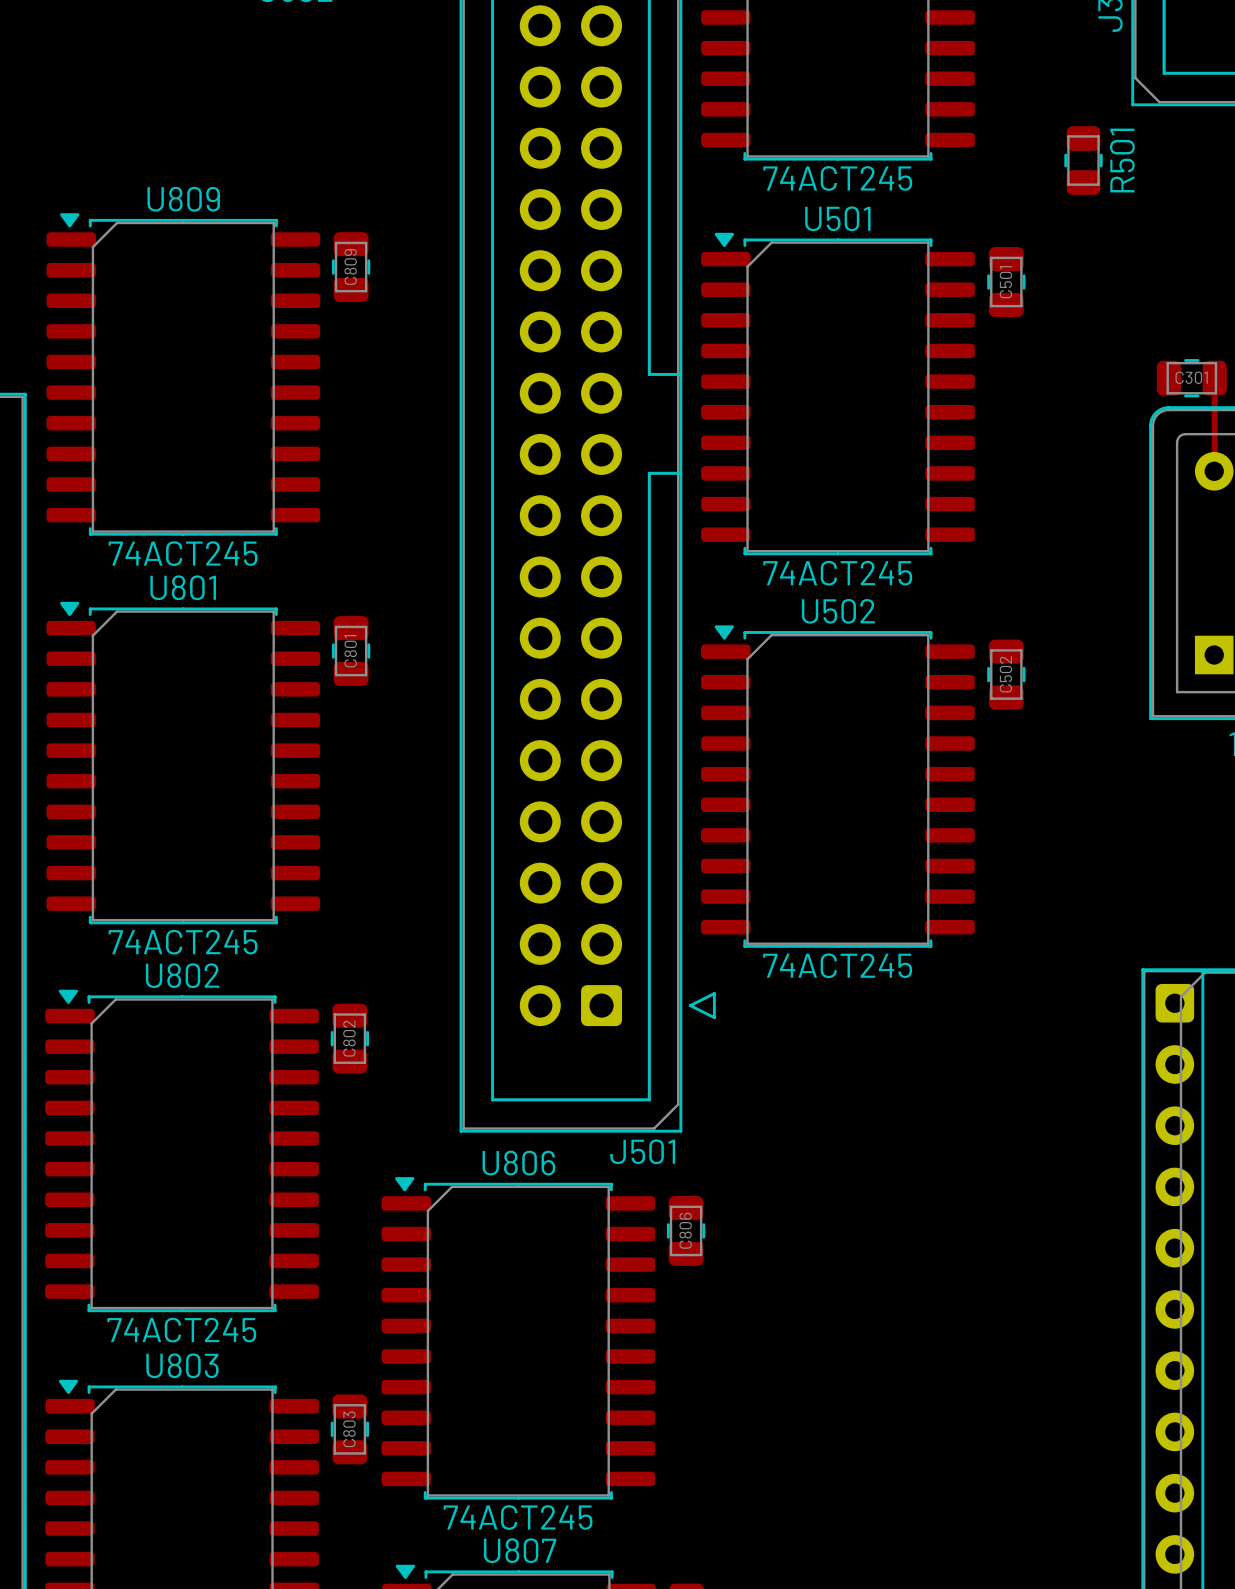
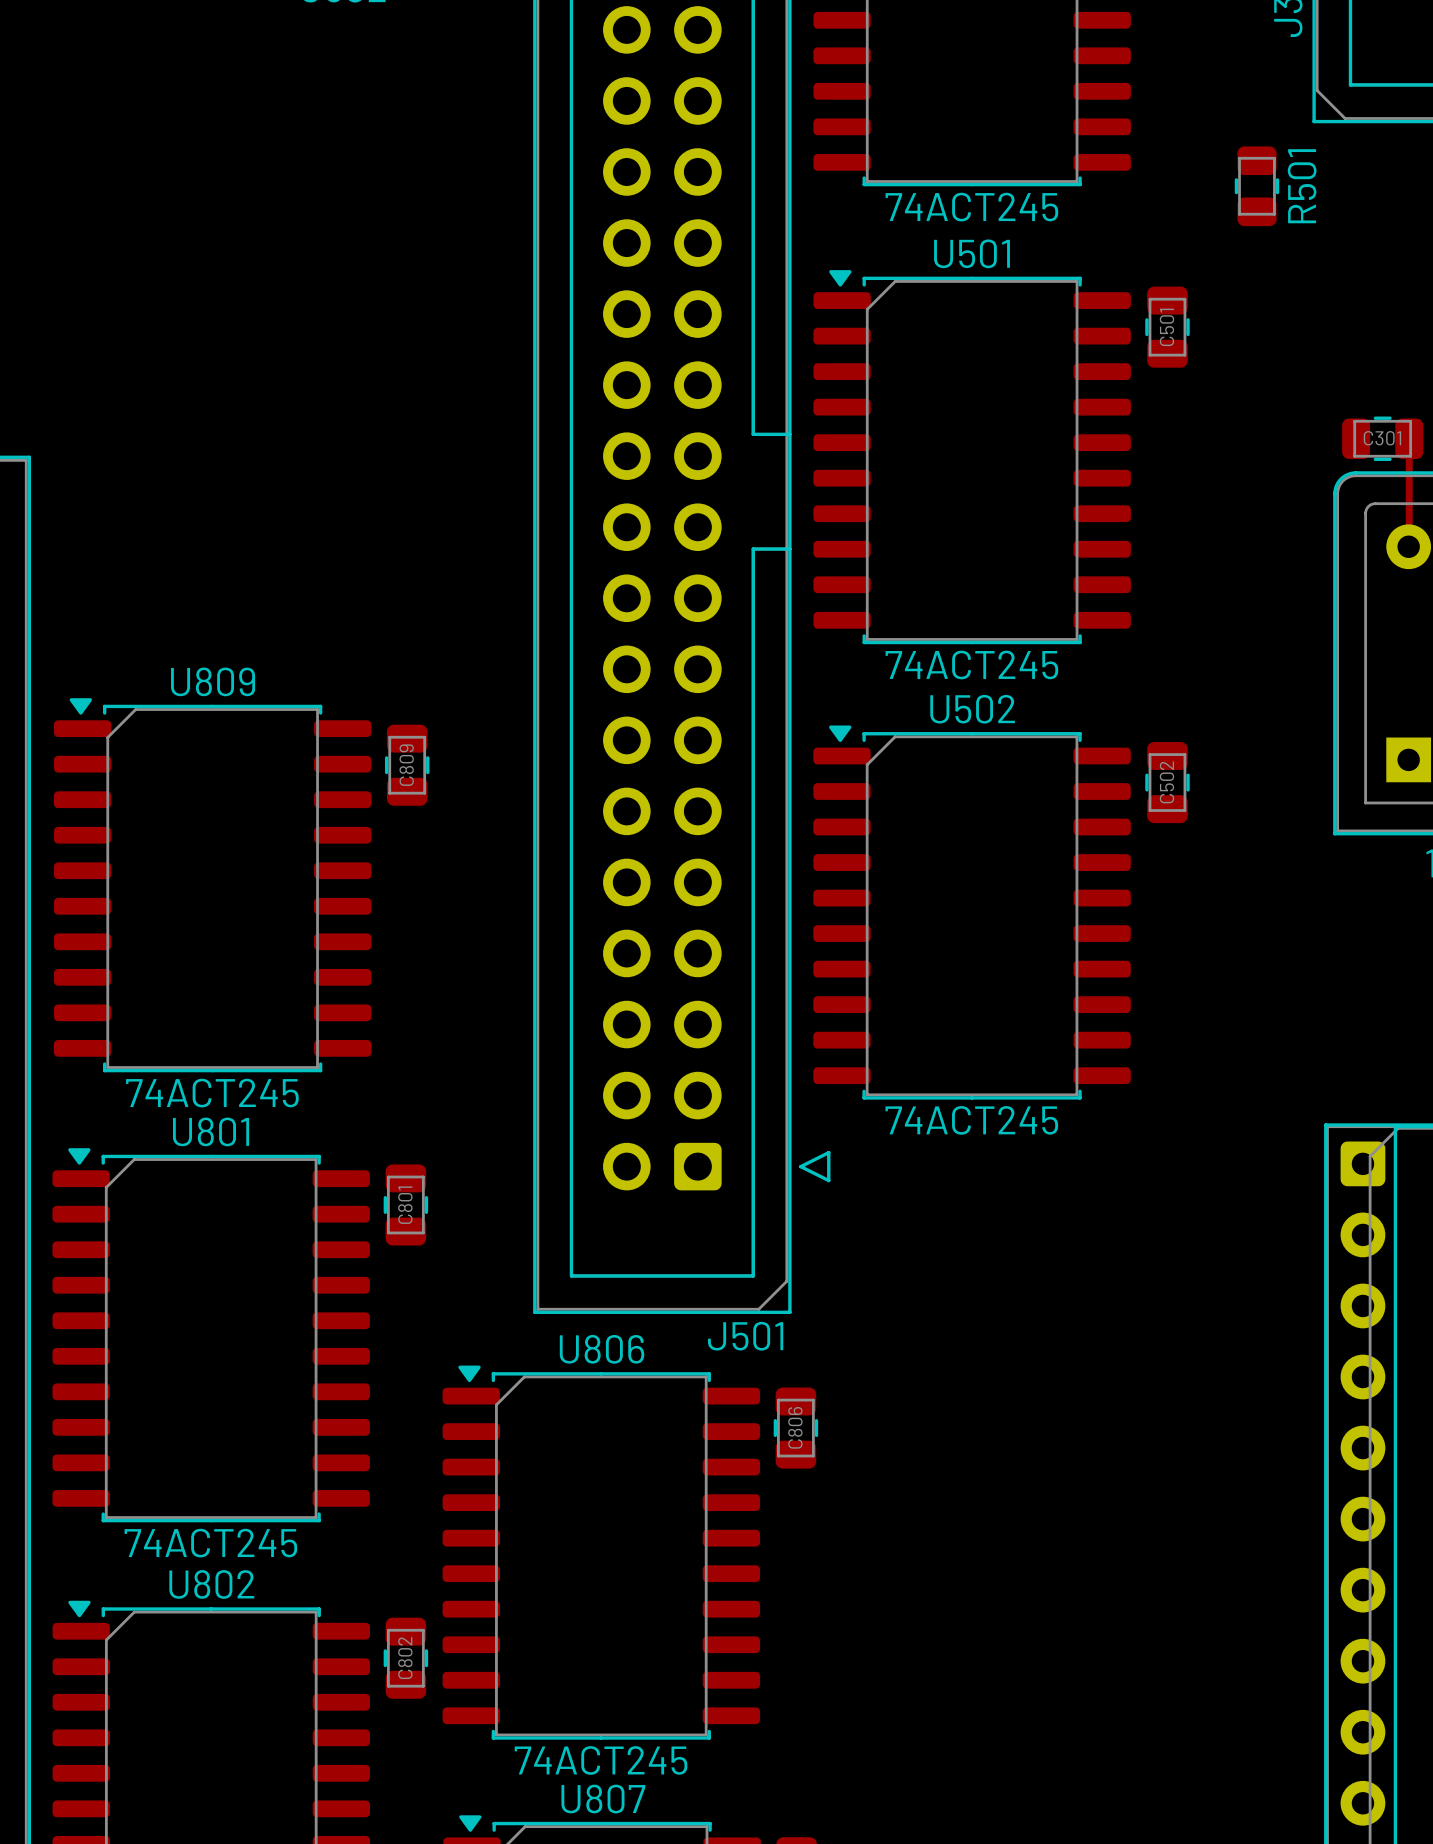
C809 position: (351, 267) -> (407, 765)
U809: 74ACT245 (183, 374) -> none
U801 name: U801 (183, 587) -> U809 (213, 681)
C801: (351, 651) -> none
U802 name: U802 (182, 975) -> U801 (211, 1131)
C802 name: C802 (349, 1038) -> C801 (405, 1205)
U803 name: U803 (182, 1365) -> U802 (211, 1584)
C803 name: C803 (349, 1429) -> C802 (405, 1658)

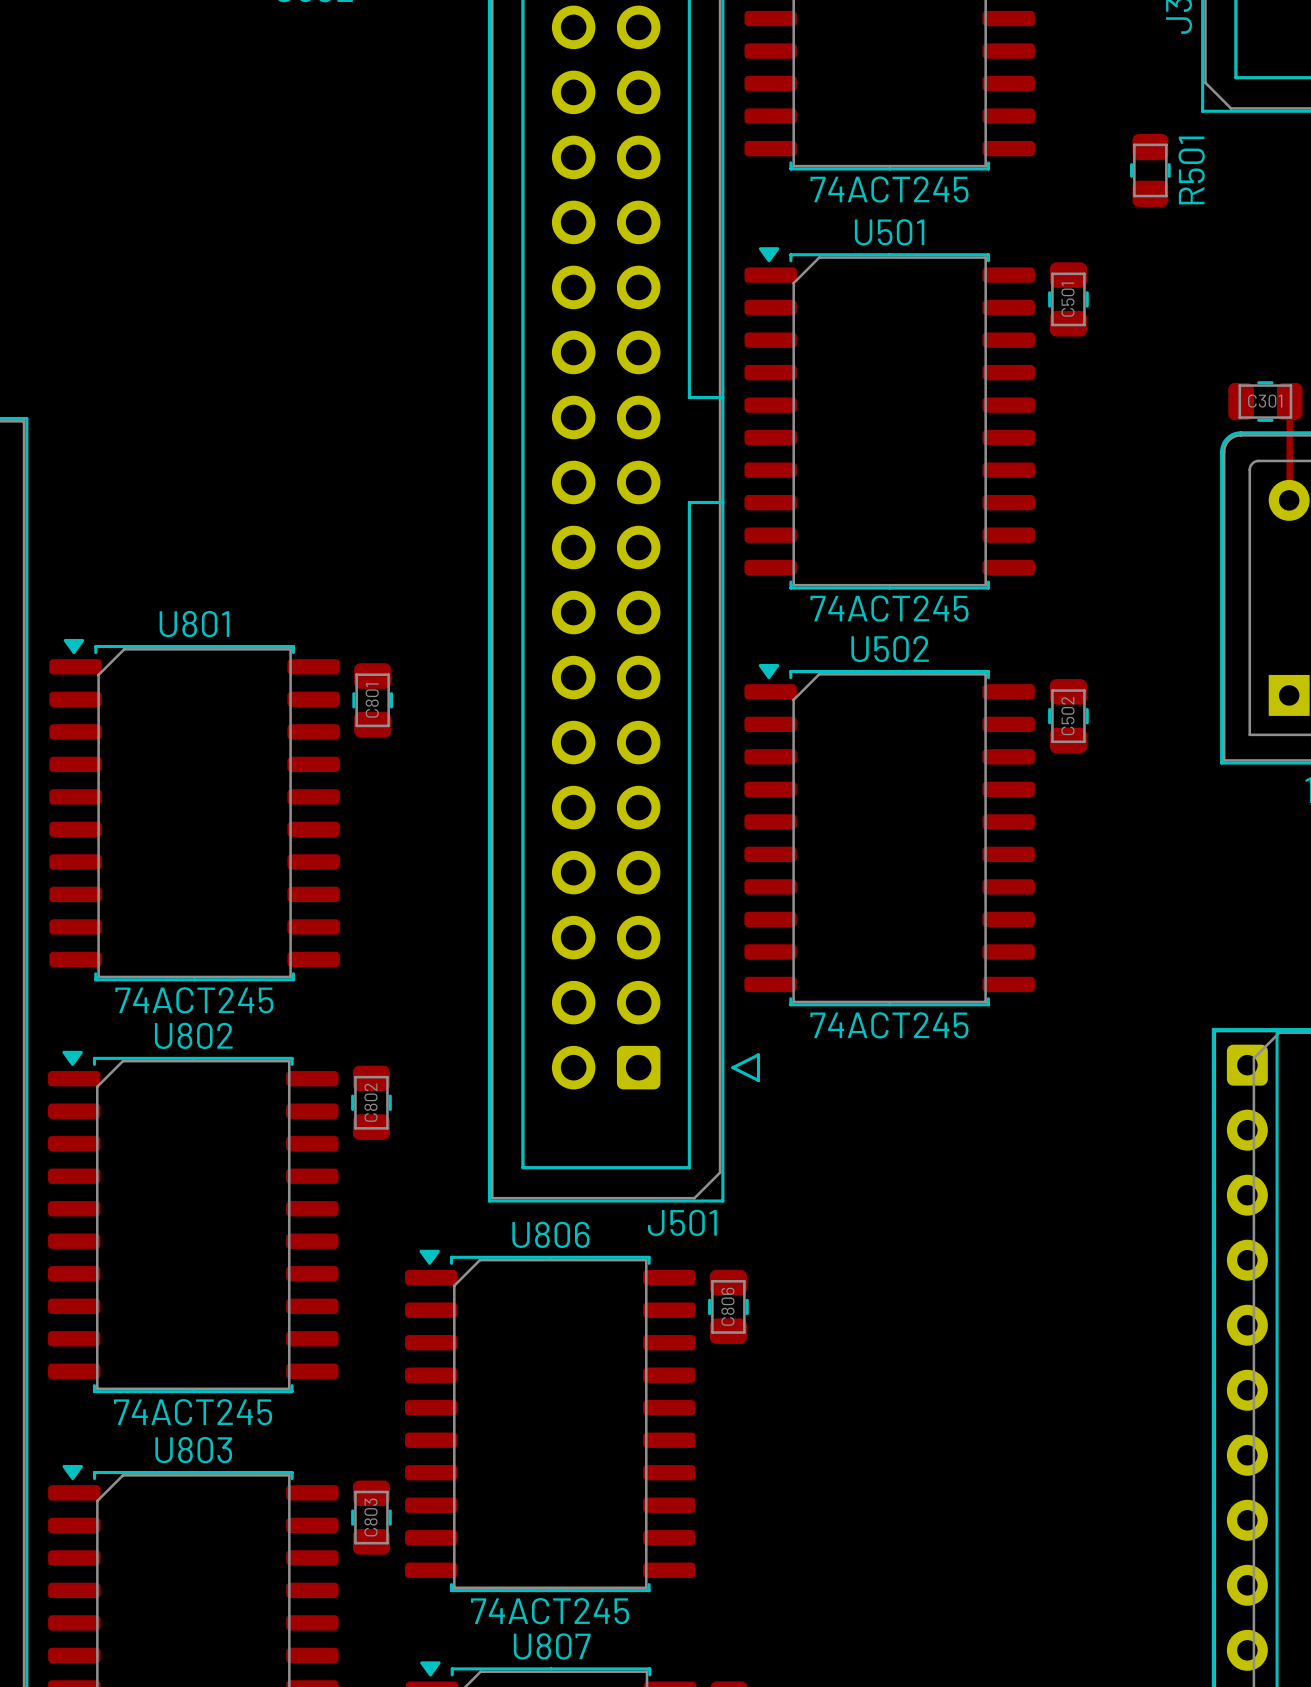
U809 name: U809 (213, 681) -> U801 (194, 624)
C809 name: C809 (406, 765) -> C801 (372, 700)
U801 name: U801 (211, 1131) -> U802 (193, 1035)
C801 name: C801 (405, 1205) -> C802 (370, 1102)
U802 name: U802 (211, 1584) -> U803 (193, 1450)
C802 name: C802 (405, 1658) -> C803 (370, 1517)

